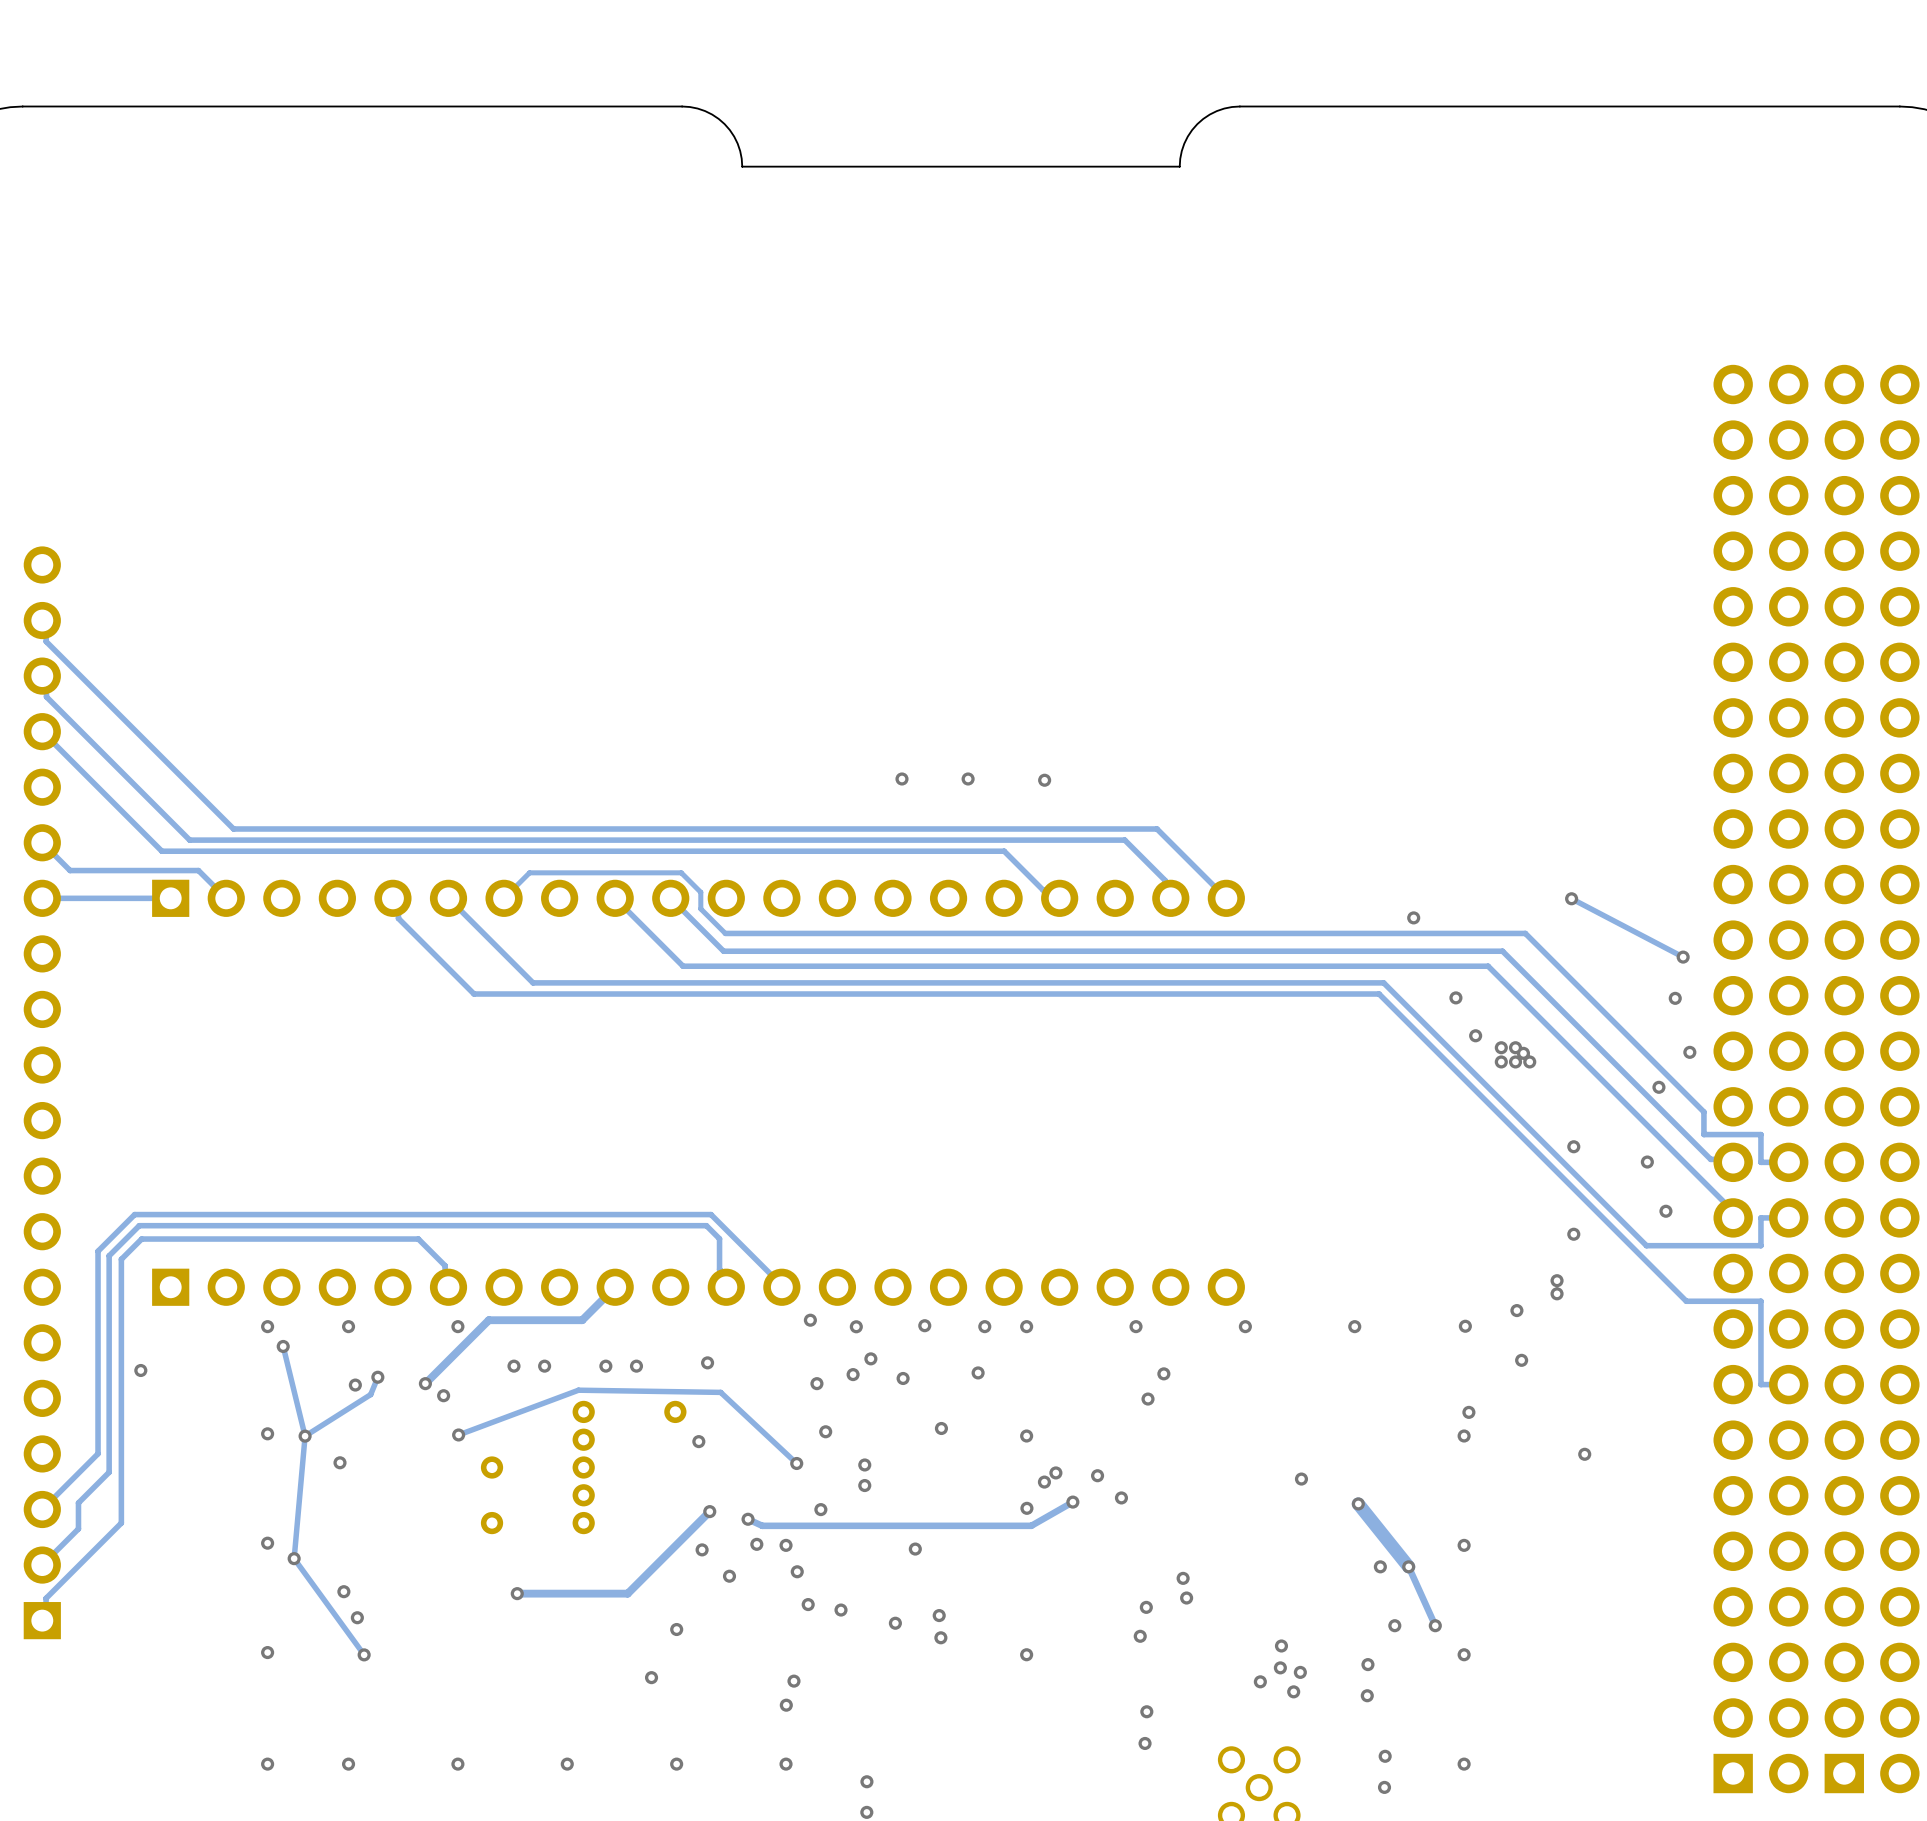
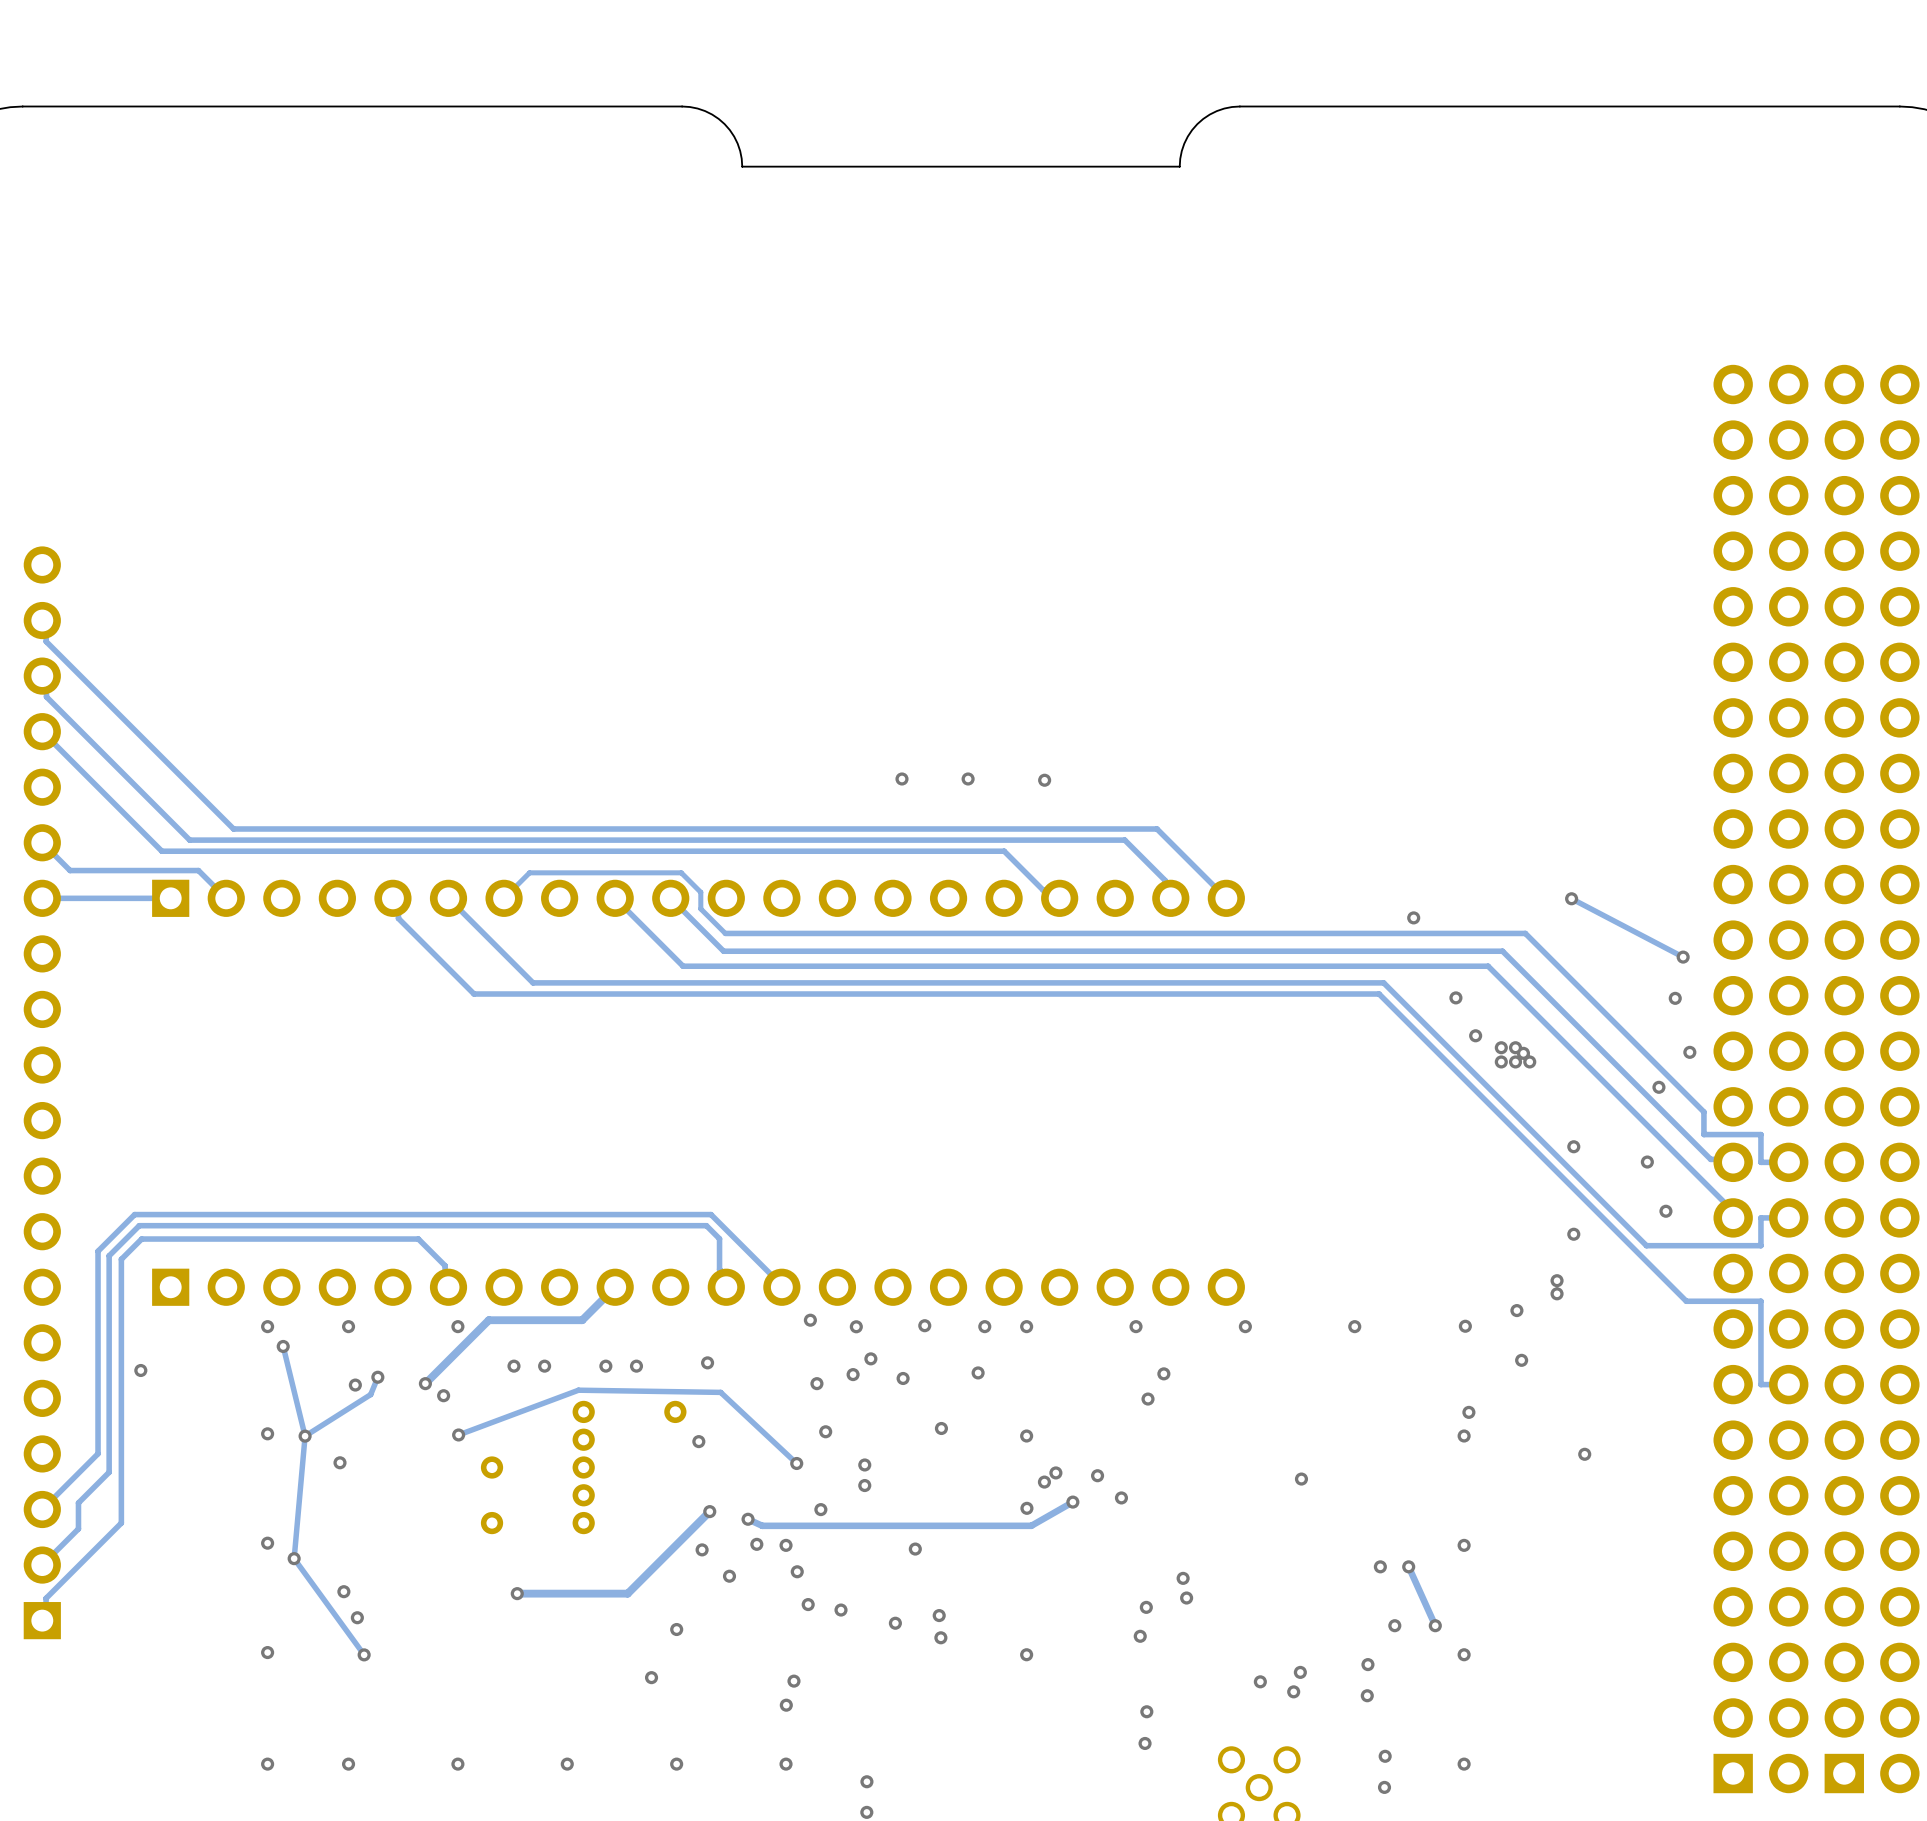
track: (1358, 1503) (1408, 1566) -> none
via: (1358, 1503) -> none
via: (1281, 1645) -> none
via: (1280, 1667) -> none

